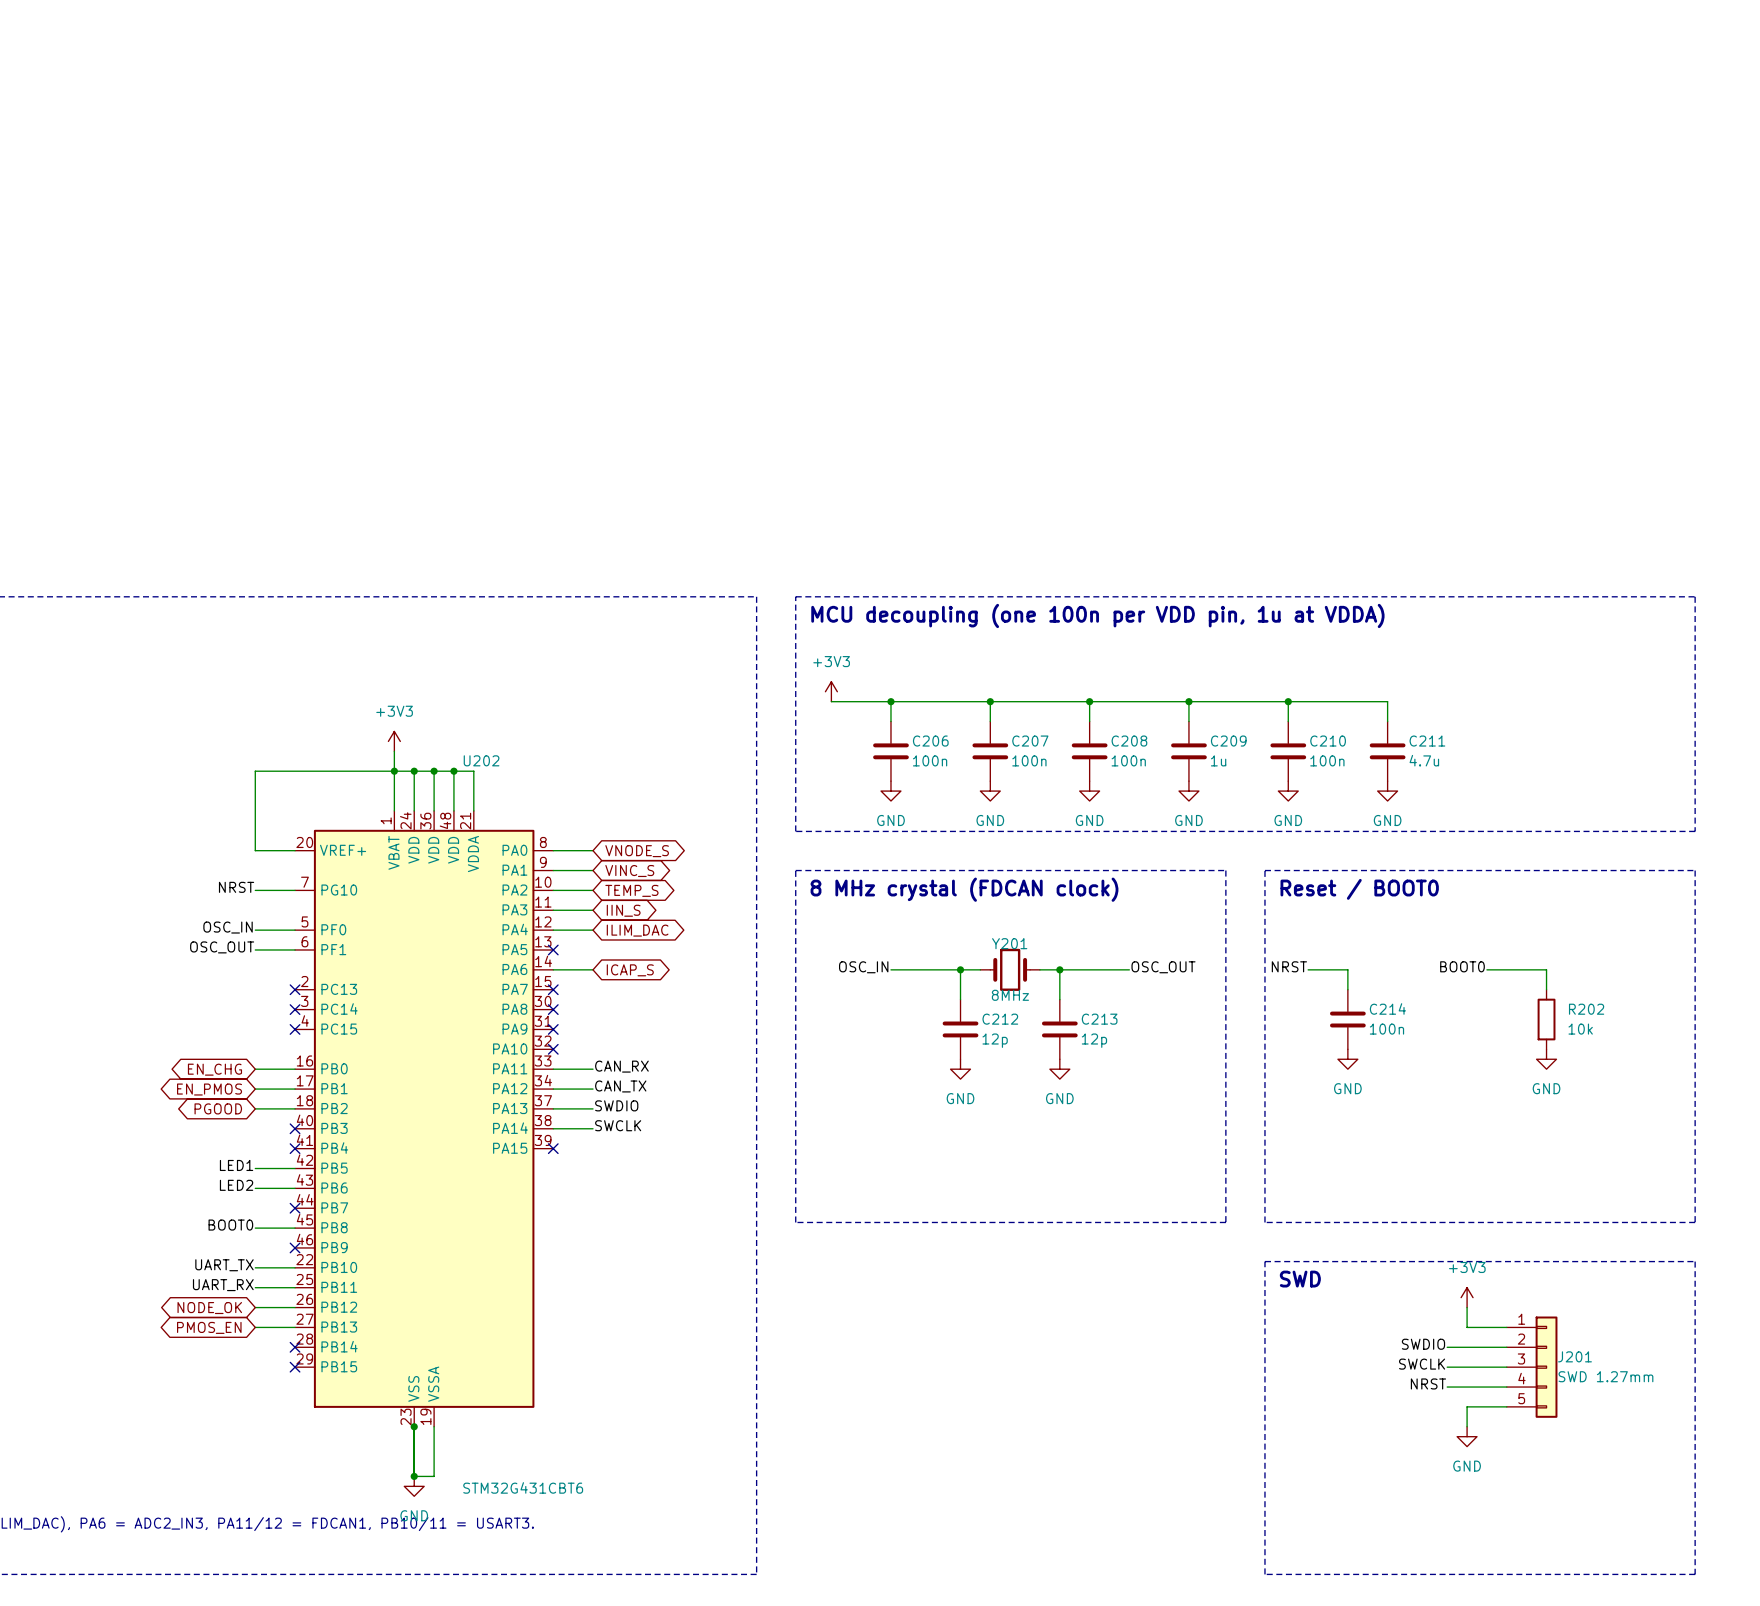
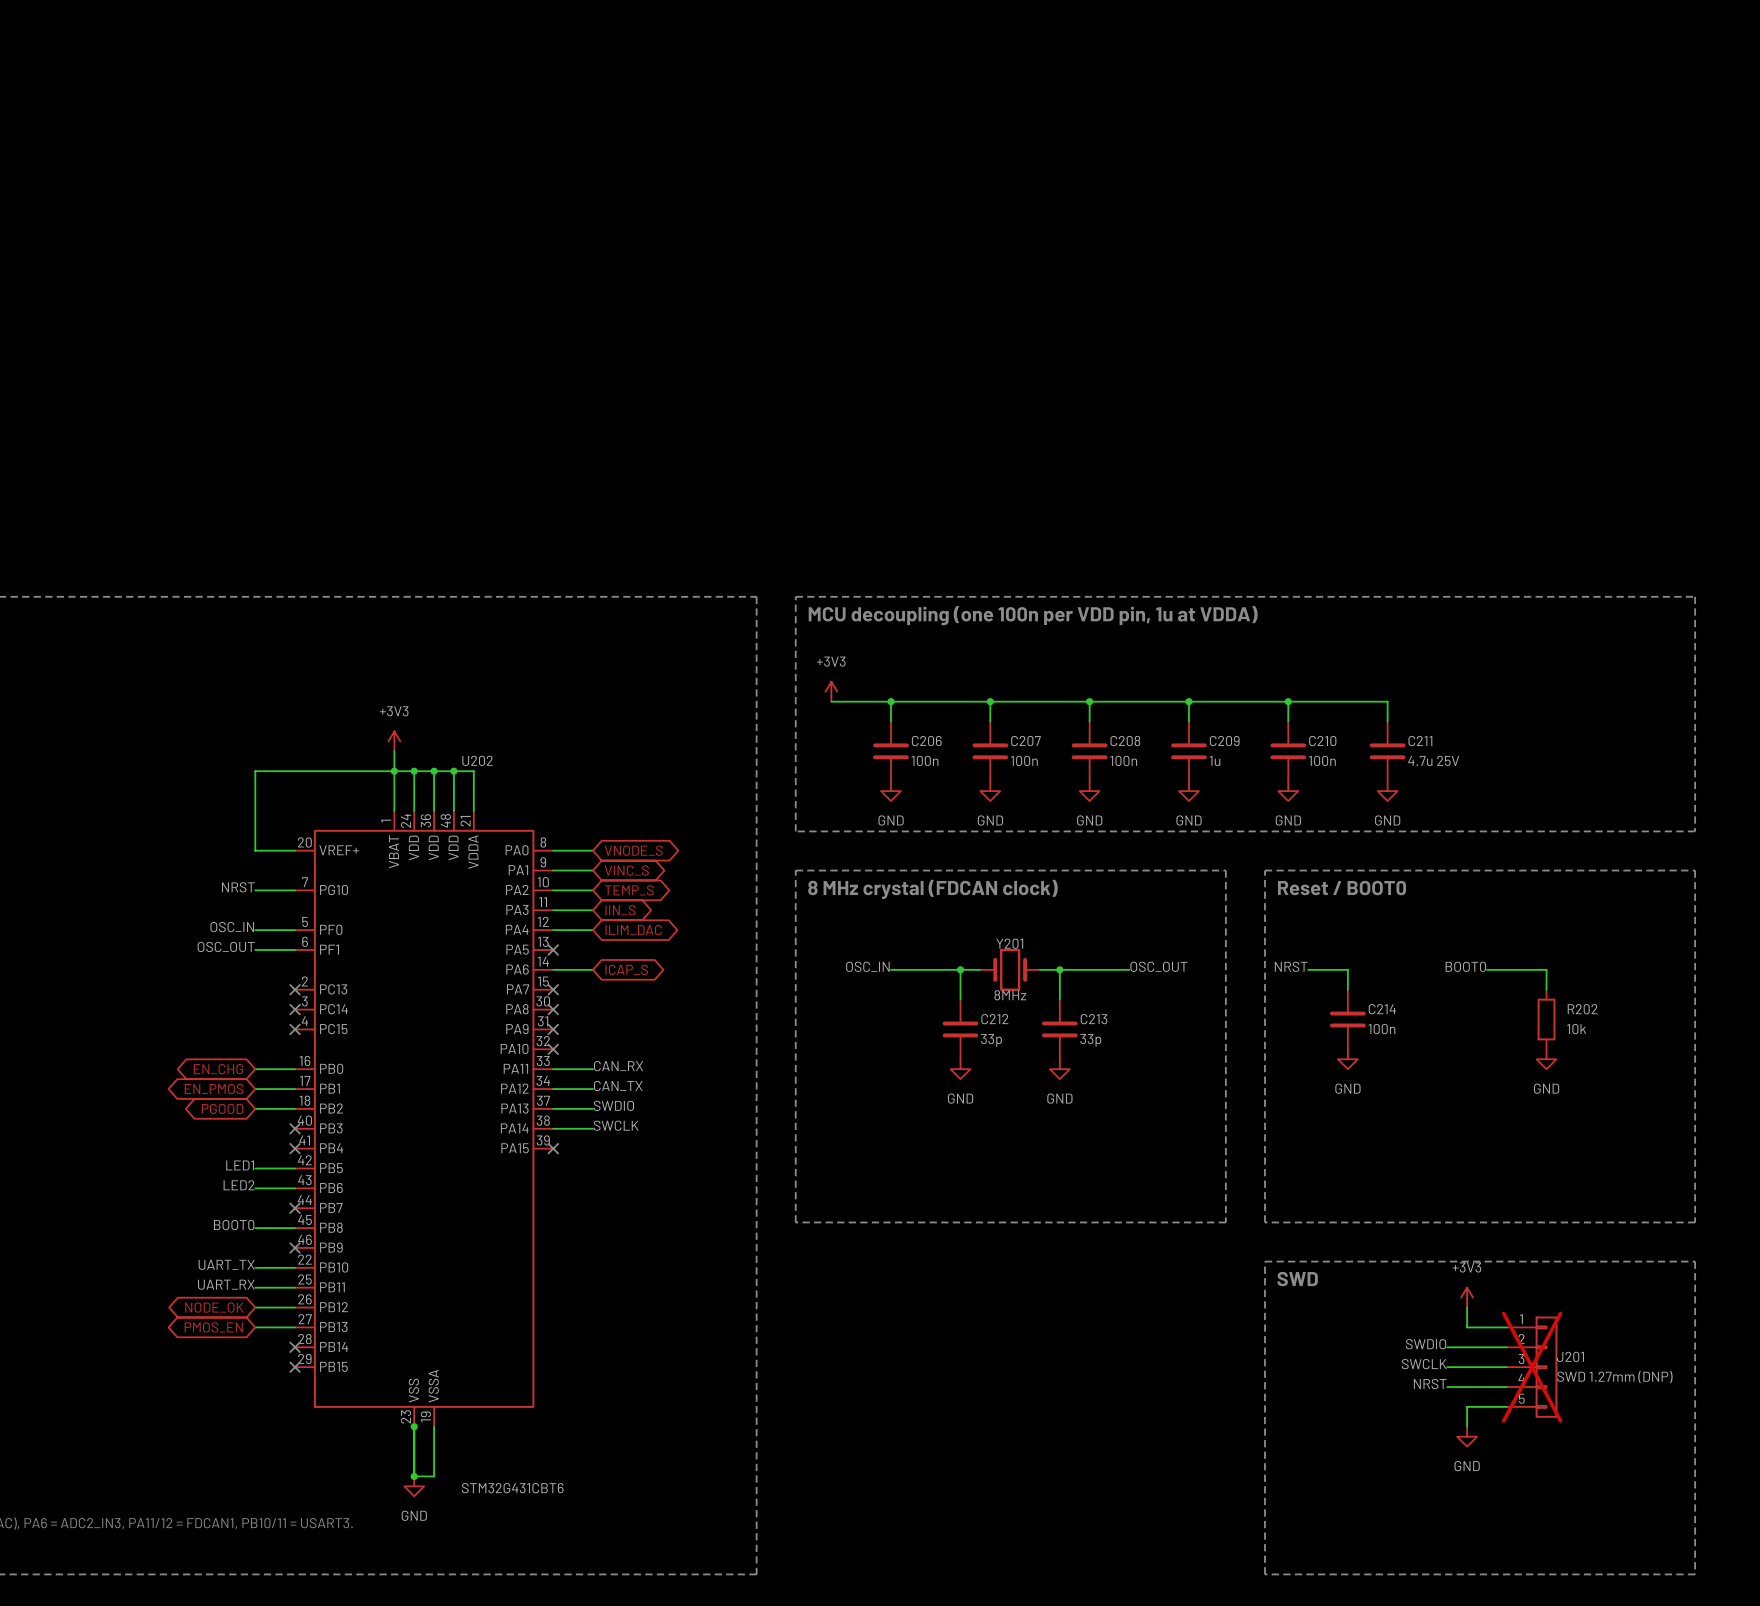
C211 value: 4.7u (1424, 760) -> 4.7u 25V (1433, 760)
C212 value: 12p (995, 1040) -> 33p (991, 1040)
C213 value: 12p (1094, 1040) -> 33p (1090, 1040)
J201 do-not-place cross: none -> (1532, 1367)
J201 value: SWD 1.27mm (1605, 1376) -> SWD 1.27mm (DNP) (1614, 1377)

